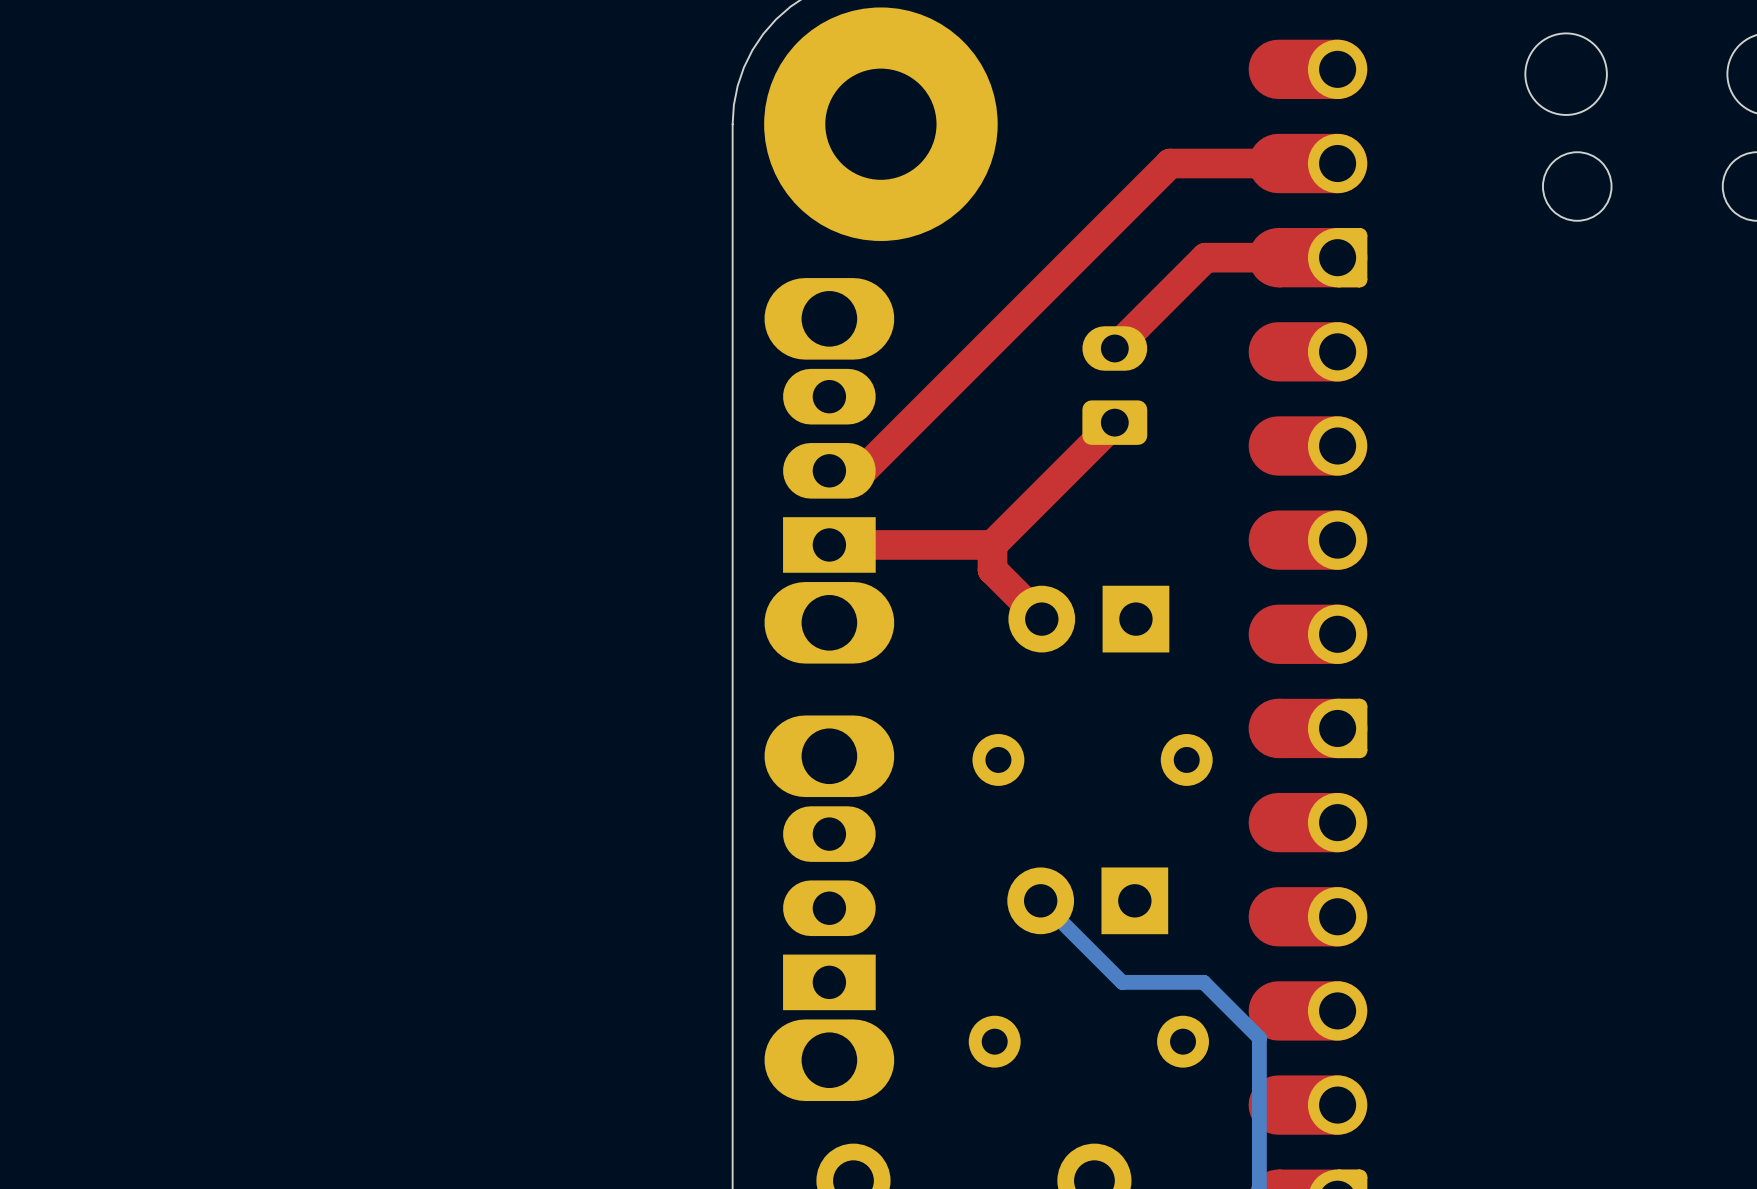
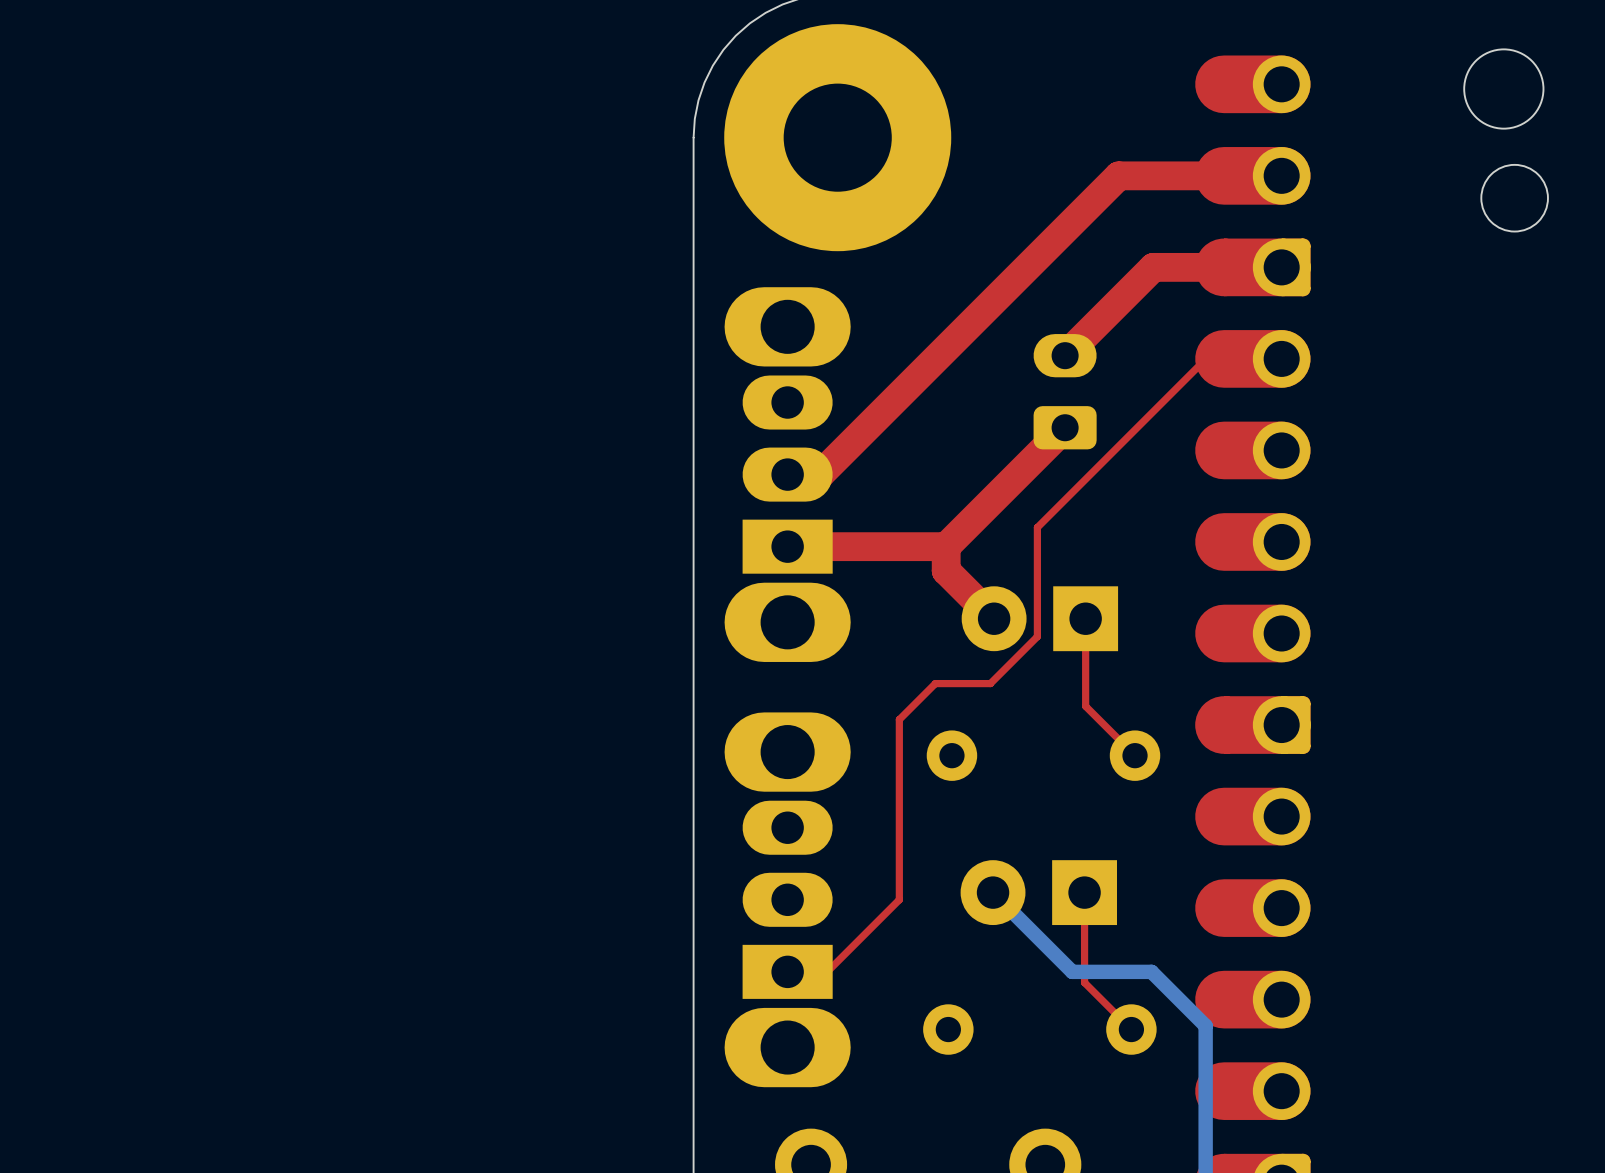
top track: none -> (1252, 358) (1206, 358) (1037, 527) (1037, 636) (990, 683) (935, 683) (899, 719) (899, 899) (827, 971) (787, 971)
top track: none -> (1085, 618) (1085, 706) (1135, 755)
top track: none -> (1084, 892) (1084, 982) (1131, 1029)

